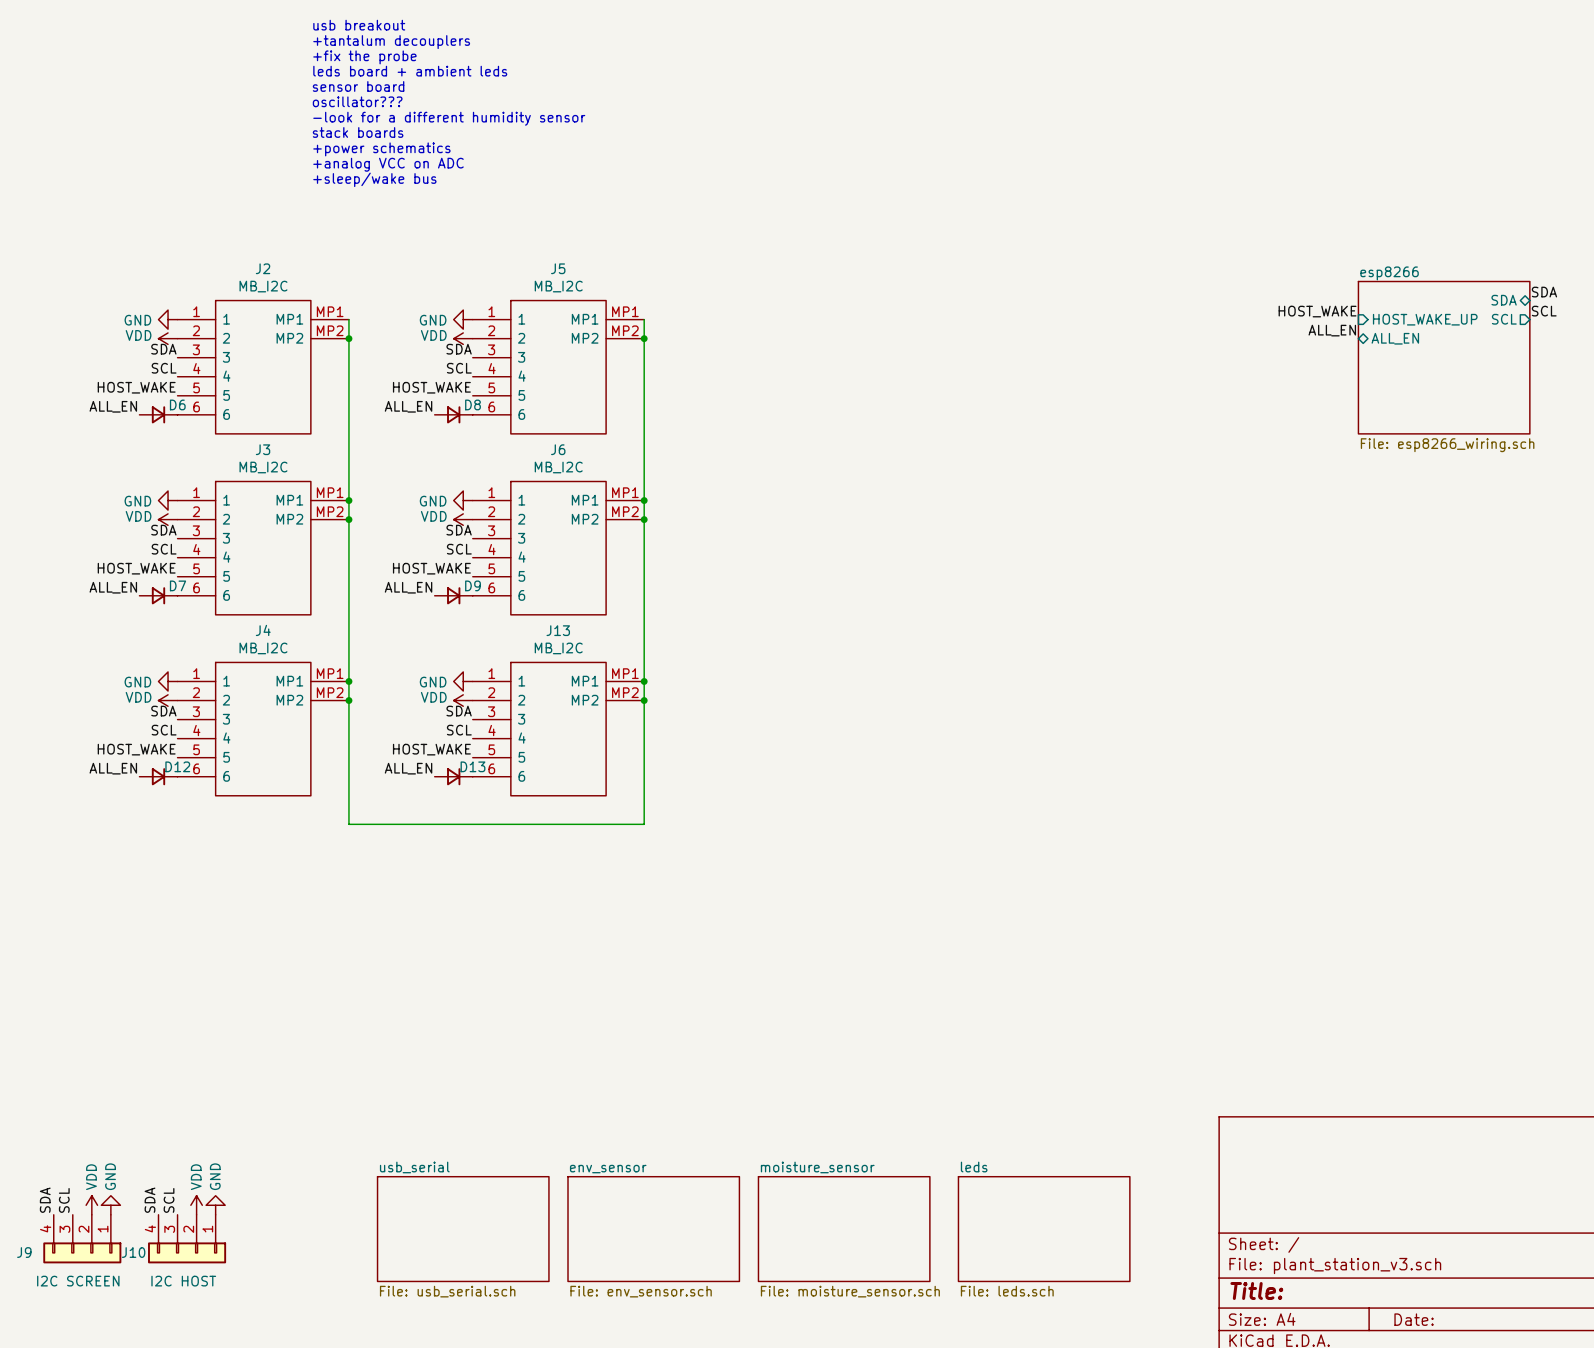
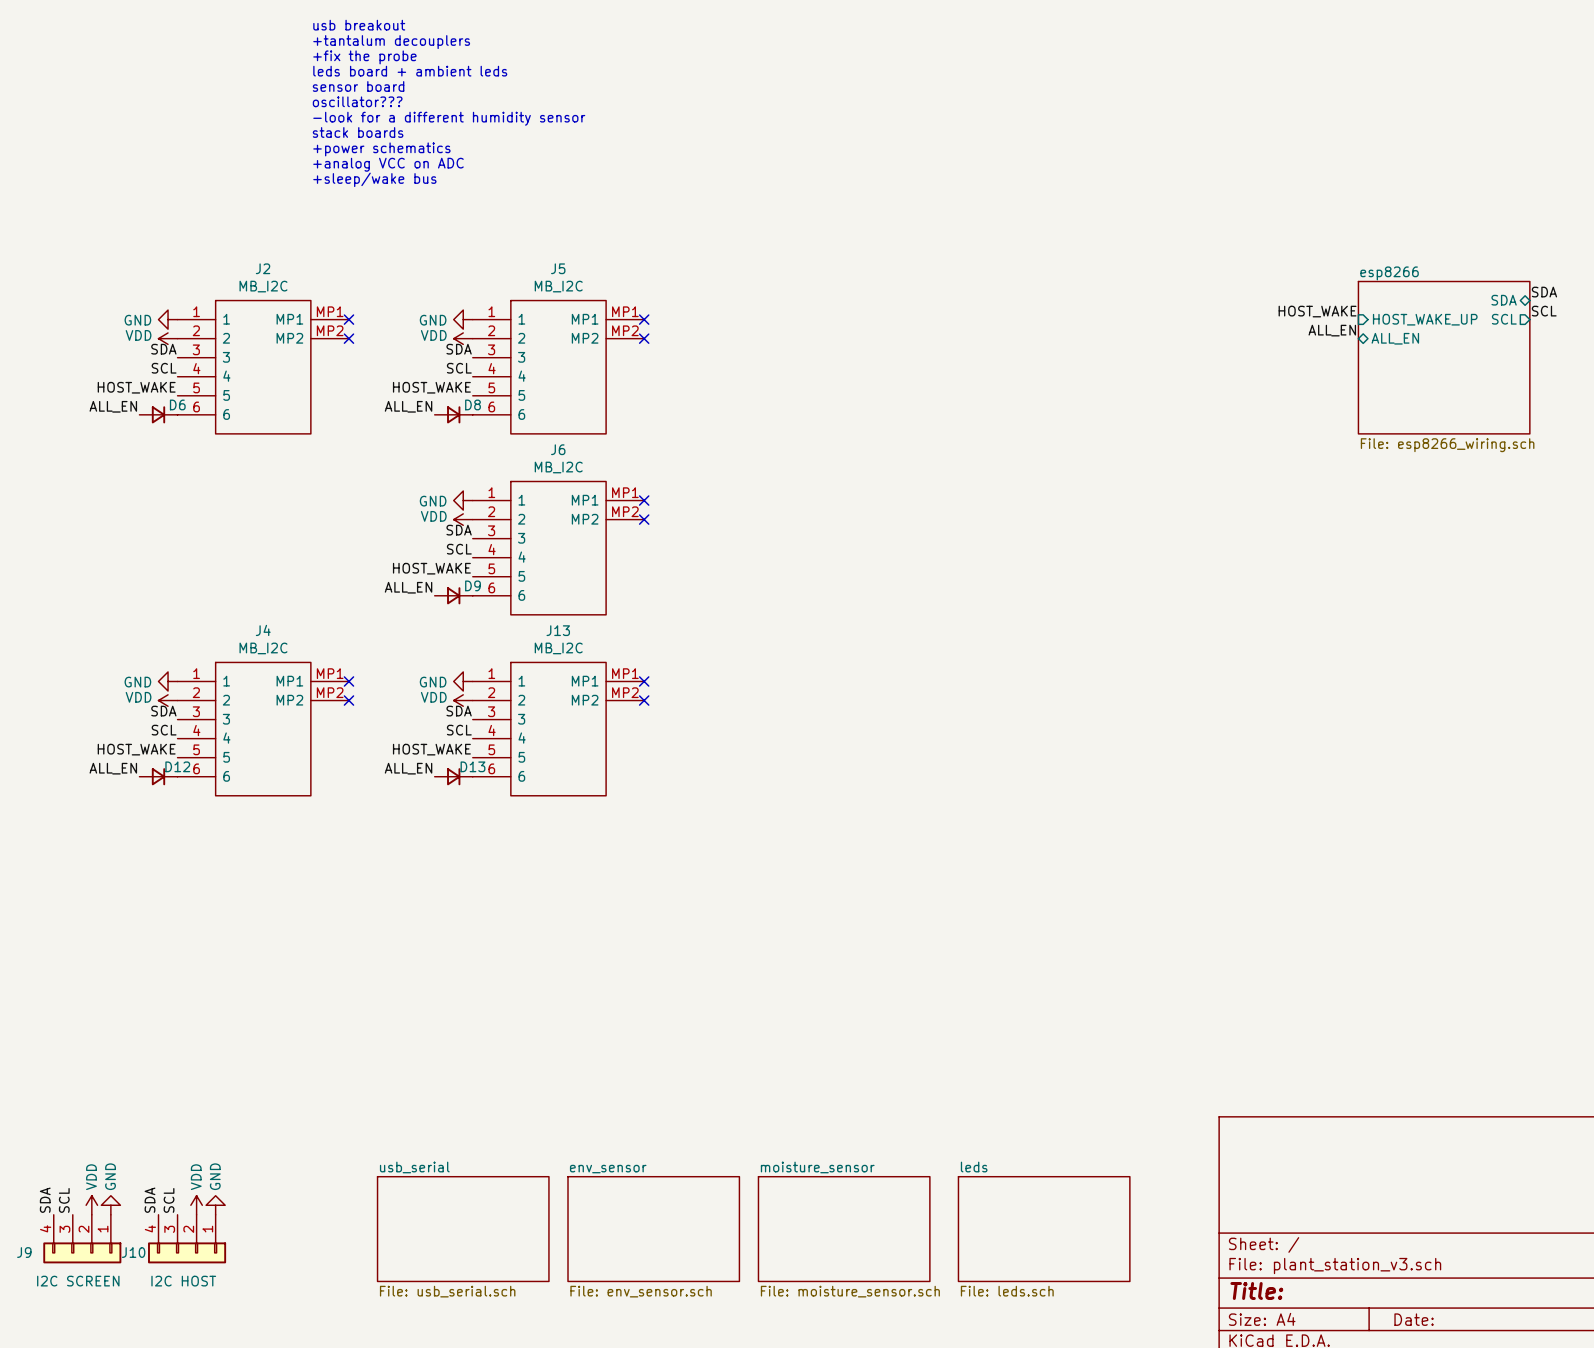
wire: (348, 319) (348, 824) (644, 824) (644, 319) -> none
no-connect mark: none -> (348, 319)
no-connect mark: none -> (644, 319)
junction: (348, 338) -> none
no-connect mark: none -> (348, 338)
junction: (644, 338) -> none
no-connect mark: none -> (644, 338)
power symbol: GND (168, 500) -> none
junction: (348, 500) -> none
junction: (644, 500) -> none
no-connect mark: none -> (644, 500)
power symbol: VDD (168, 519) -> none
junction: (348, 519) -> none
junction: (644, 519) -> none
no-connect mark: none -> (644, 519)
label: SDA (163, 530) -> none
J3: MB_I2C (263, 548) -> none
label: SCL (164, 549) -> none
label: HOST_WAKE (136, 568) -> none
label: ALL_EN (113, 587) -> none
D7: (158, 595) -> none
junction: (348, 681) -> none
no-connect mark: none -> (348, 681)
junction: (644, 681) -> none
no-connect mark: none -> (644, 681)
junction: (348, 700) -> none
no-connect mark: none -> (348, 700)
junction: (644, 700) -> none
no-connect mark: none -> (644, 700)

